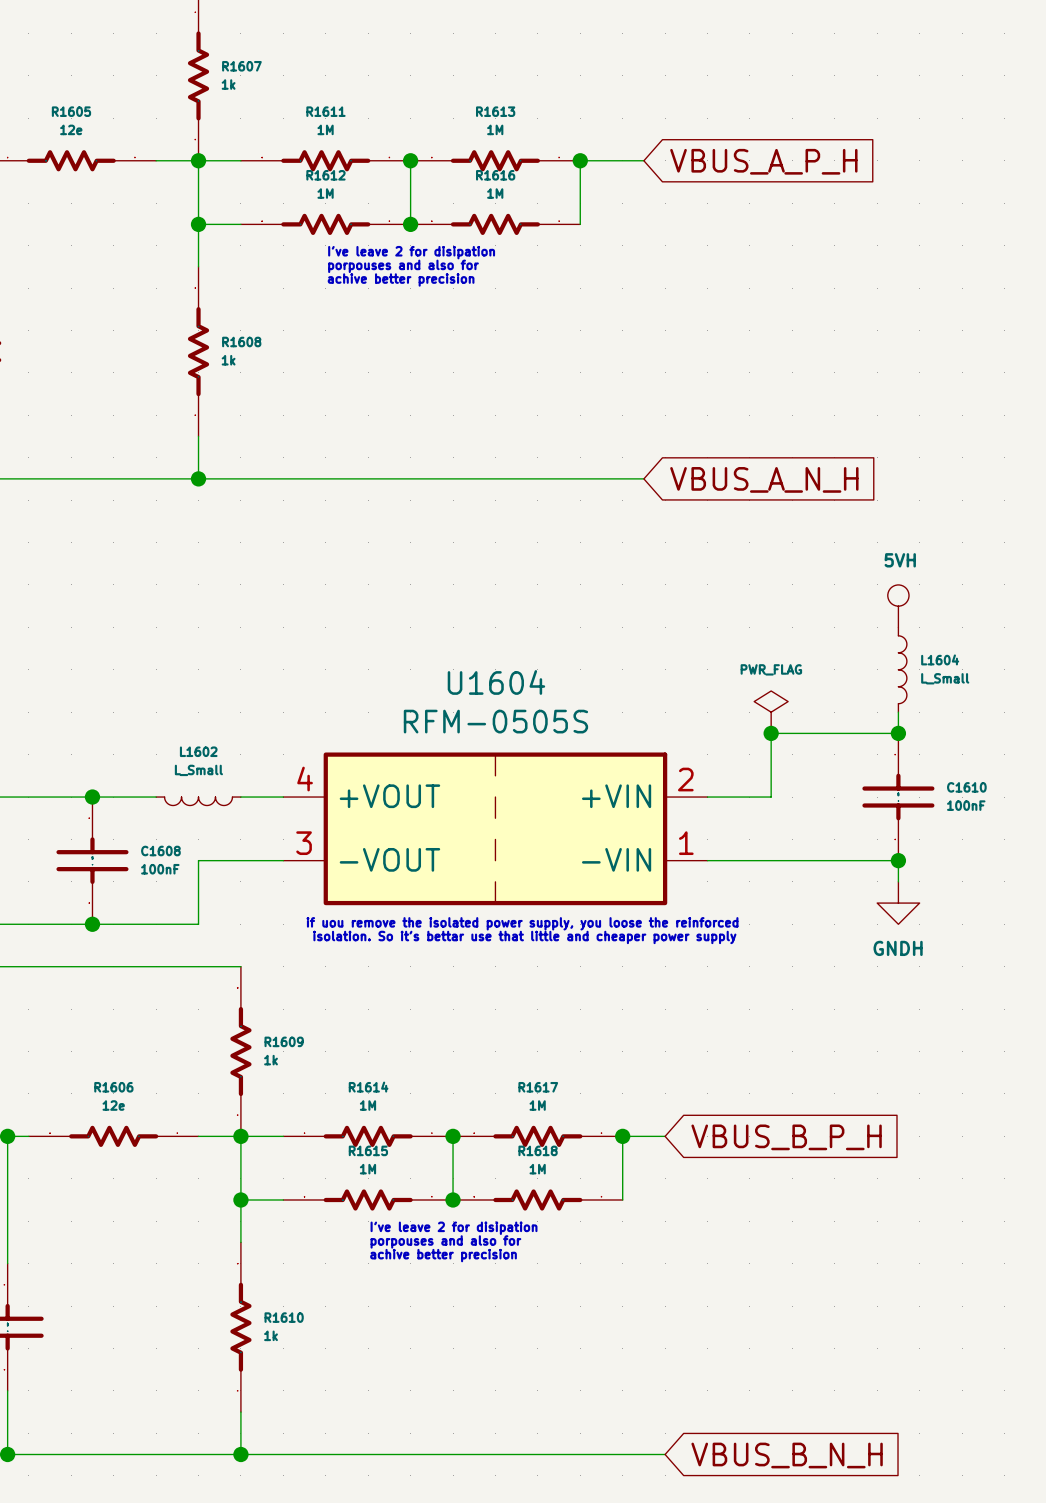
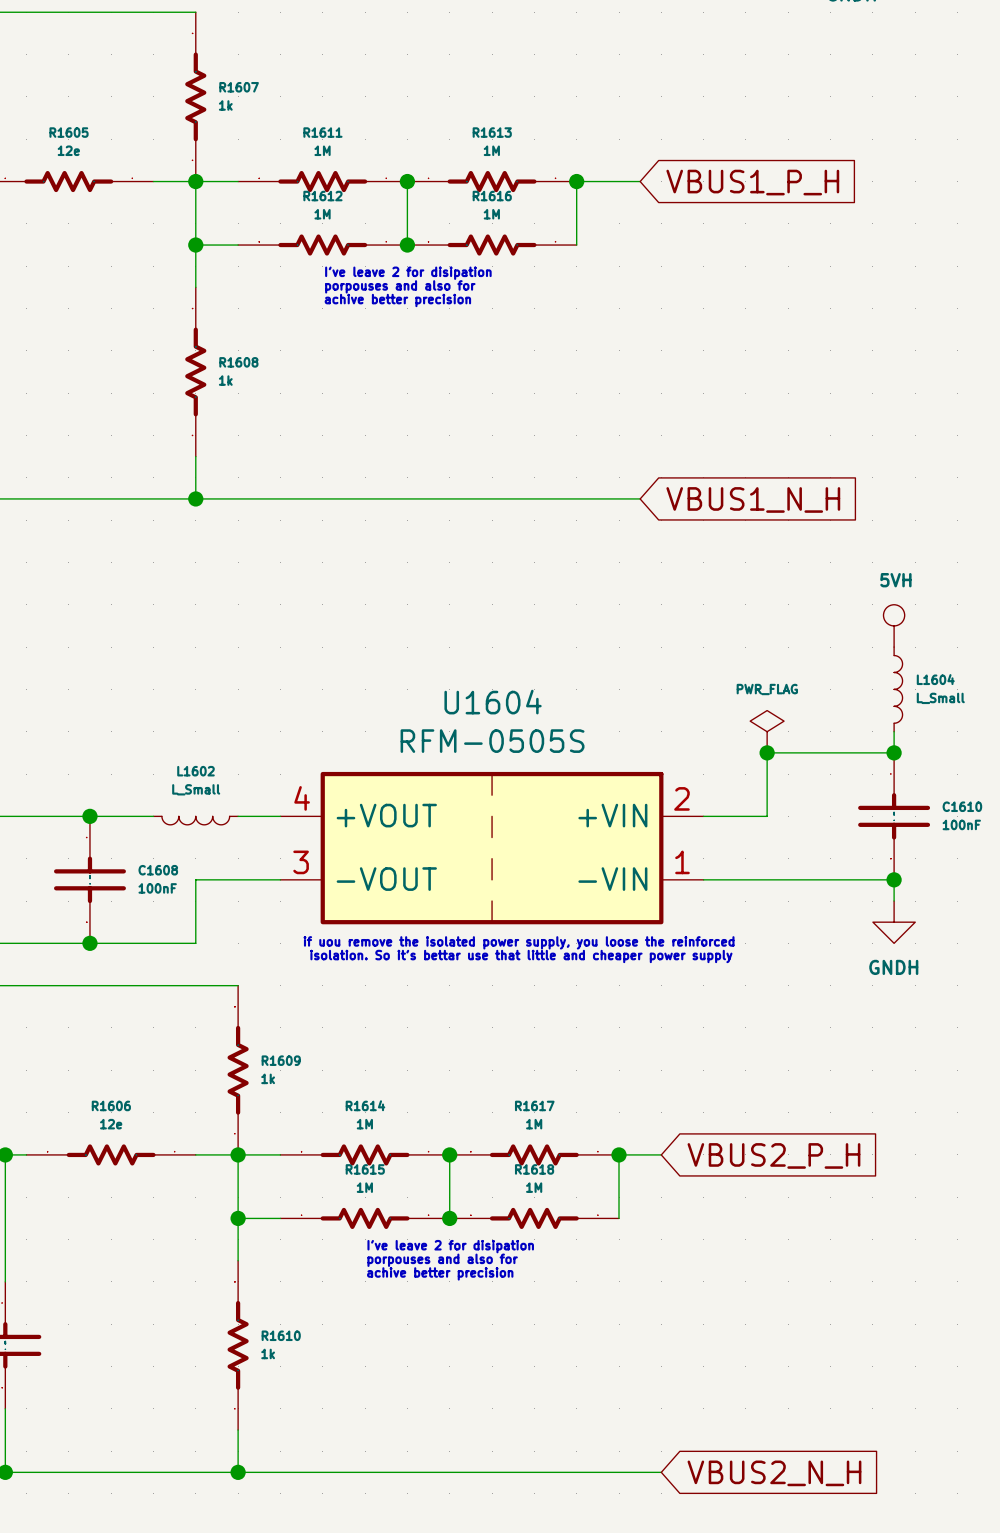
global label: VBUS_A_P_H (763, 161) -> VBUS1_P_H (752, 182)
global label: VBUS_A_N_H (764, 479) -> VBUS1_N_H (753, 499)
global label: VBUS_B_P_H (786, 1137) -> VBUS2_P_H (773, 1155)
global label: VBUS_B_N_H (787, 1455) -> VBUS2_N_H (774, 1473)

